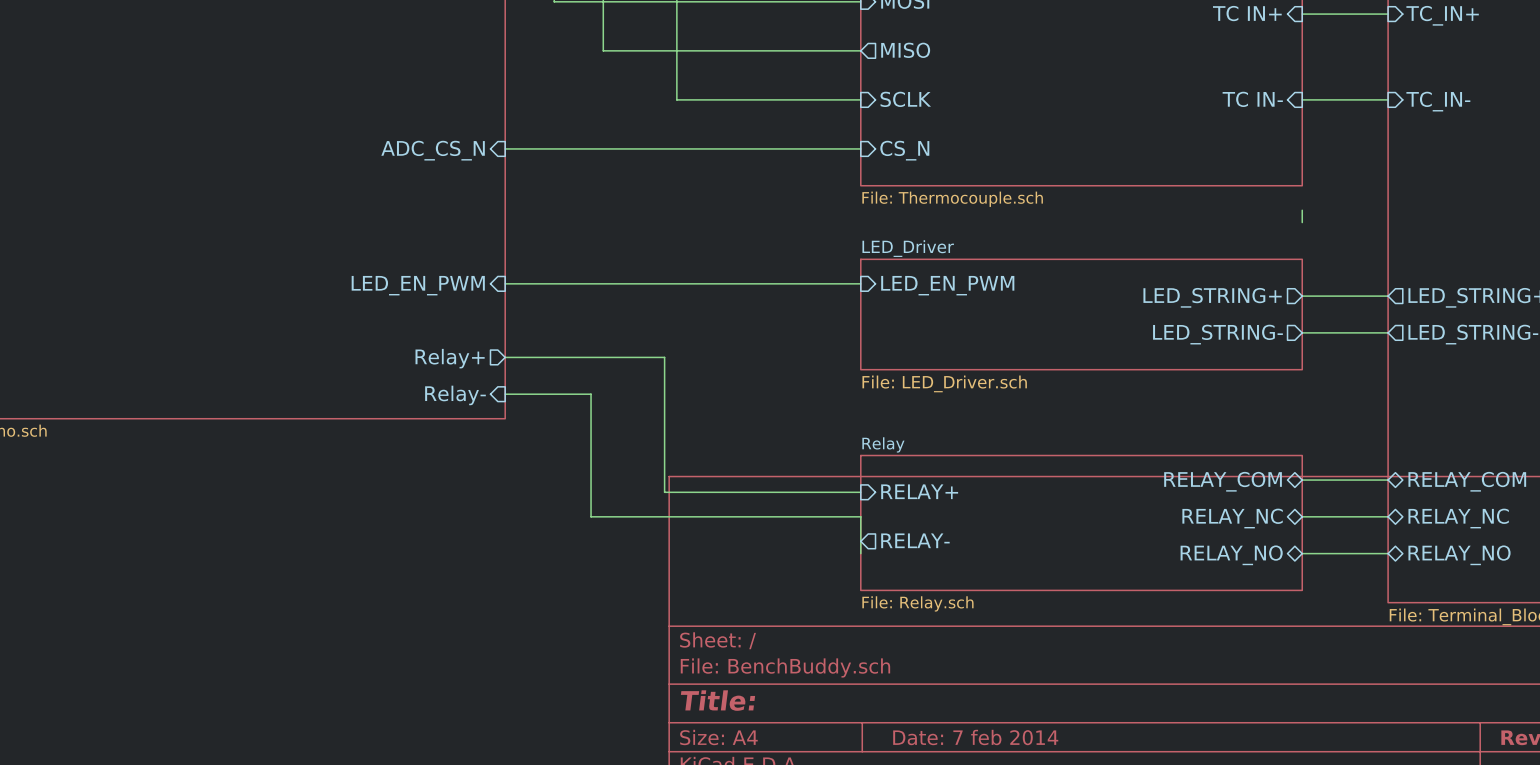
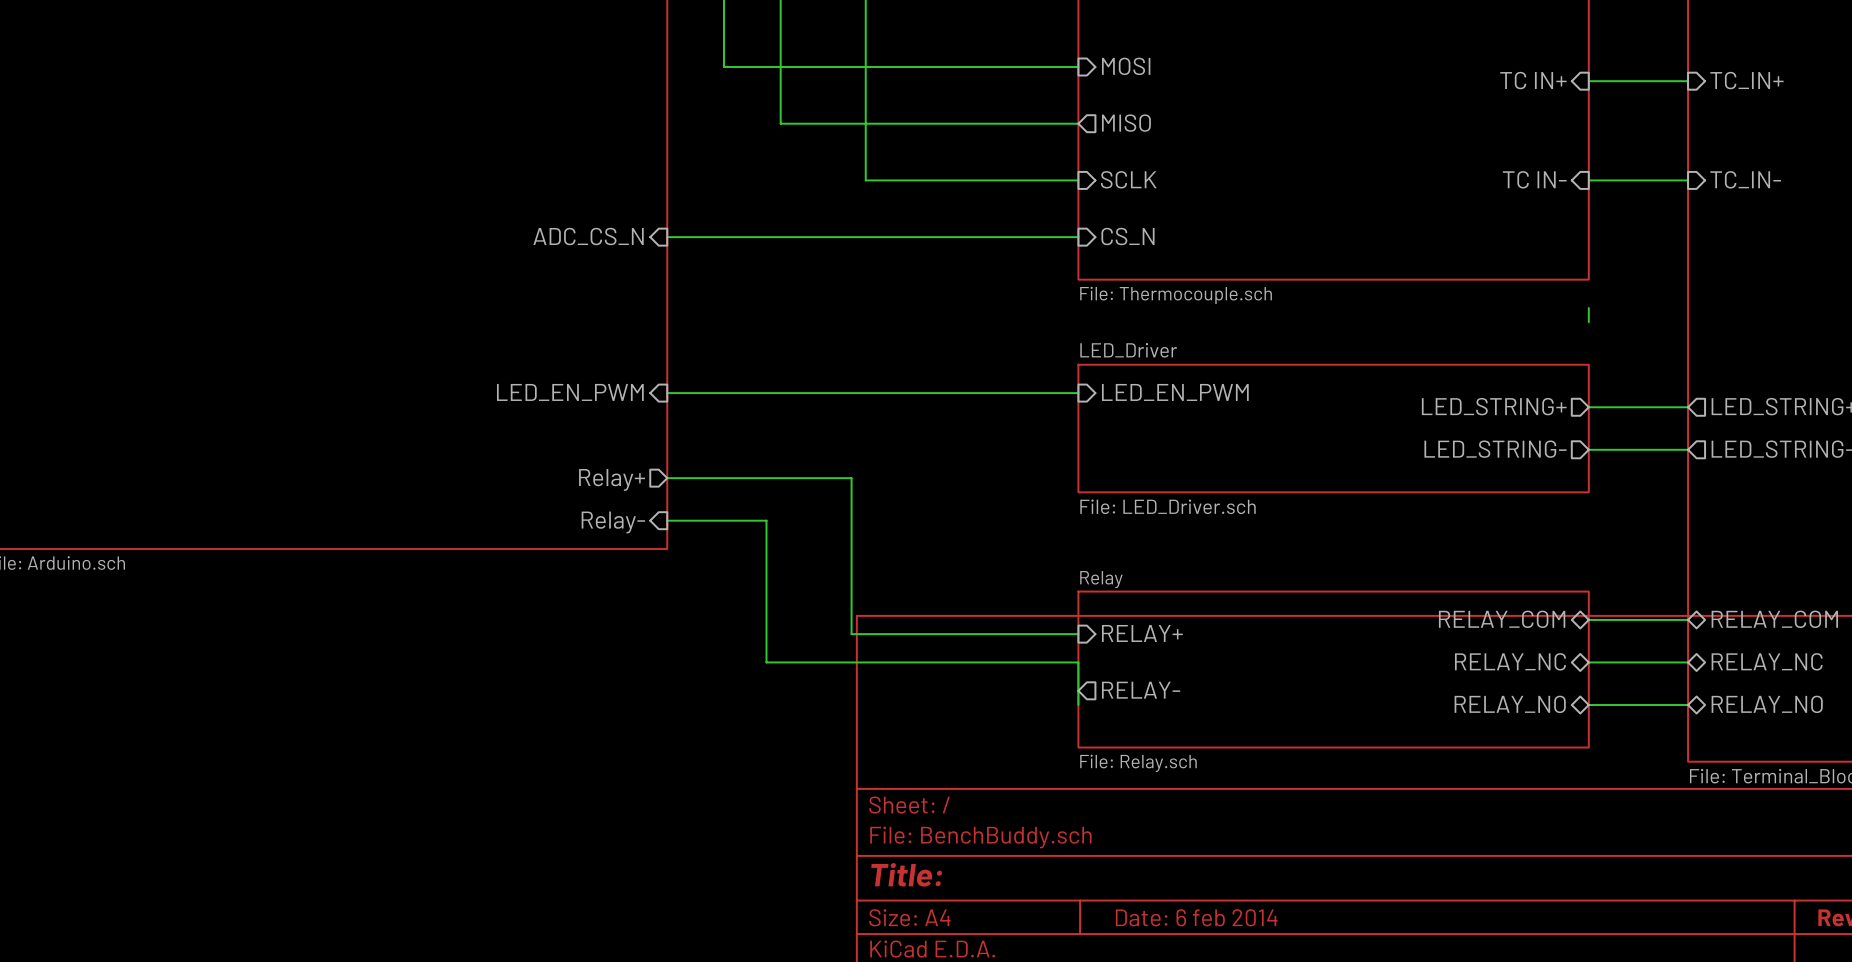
title block: Date: 7 feb 2014 (975, 737) -> Date: 6 feb 2014 (1196, 917)

